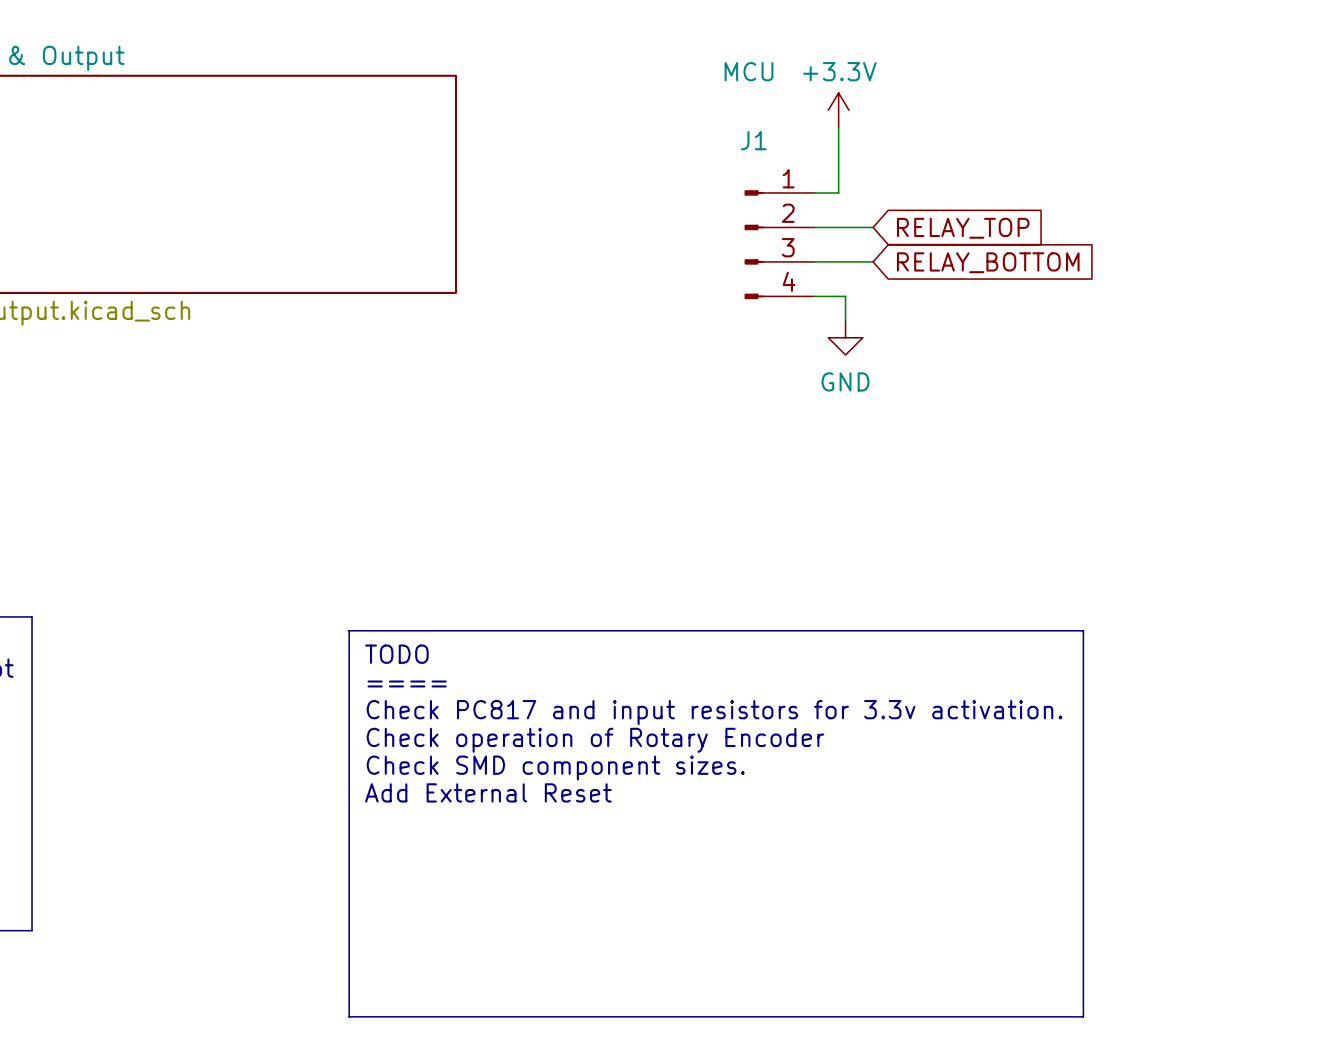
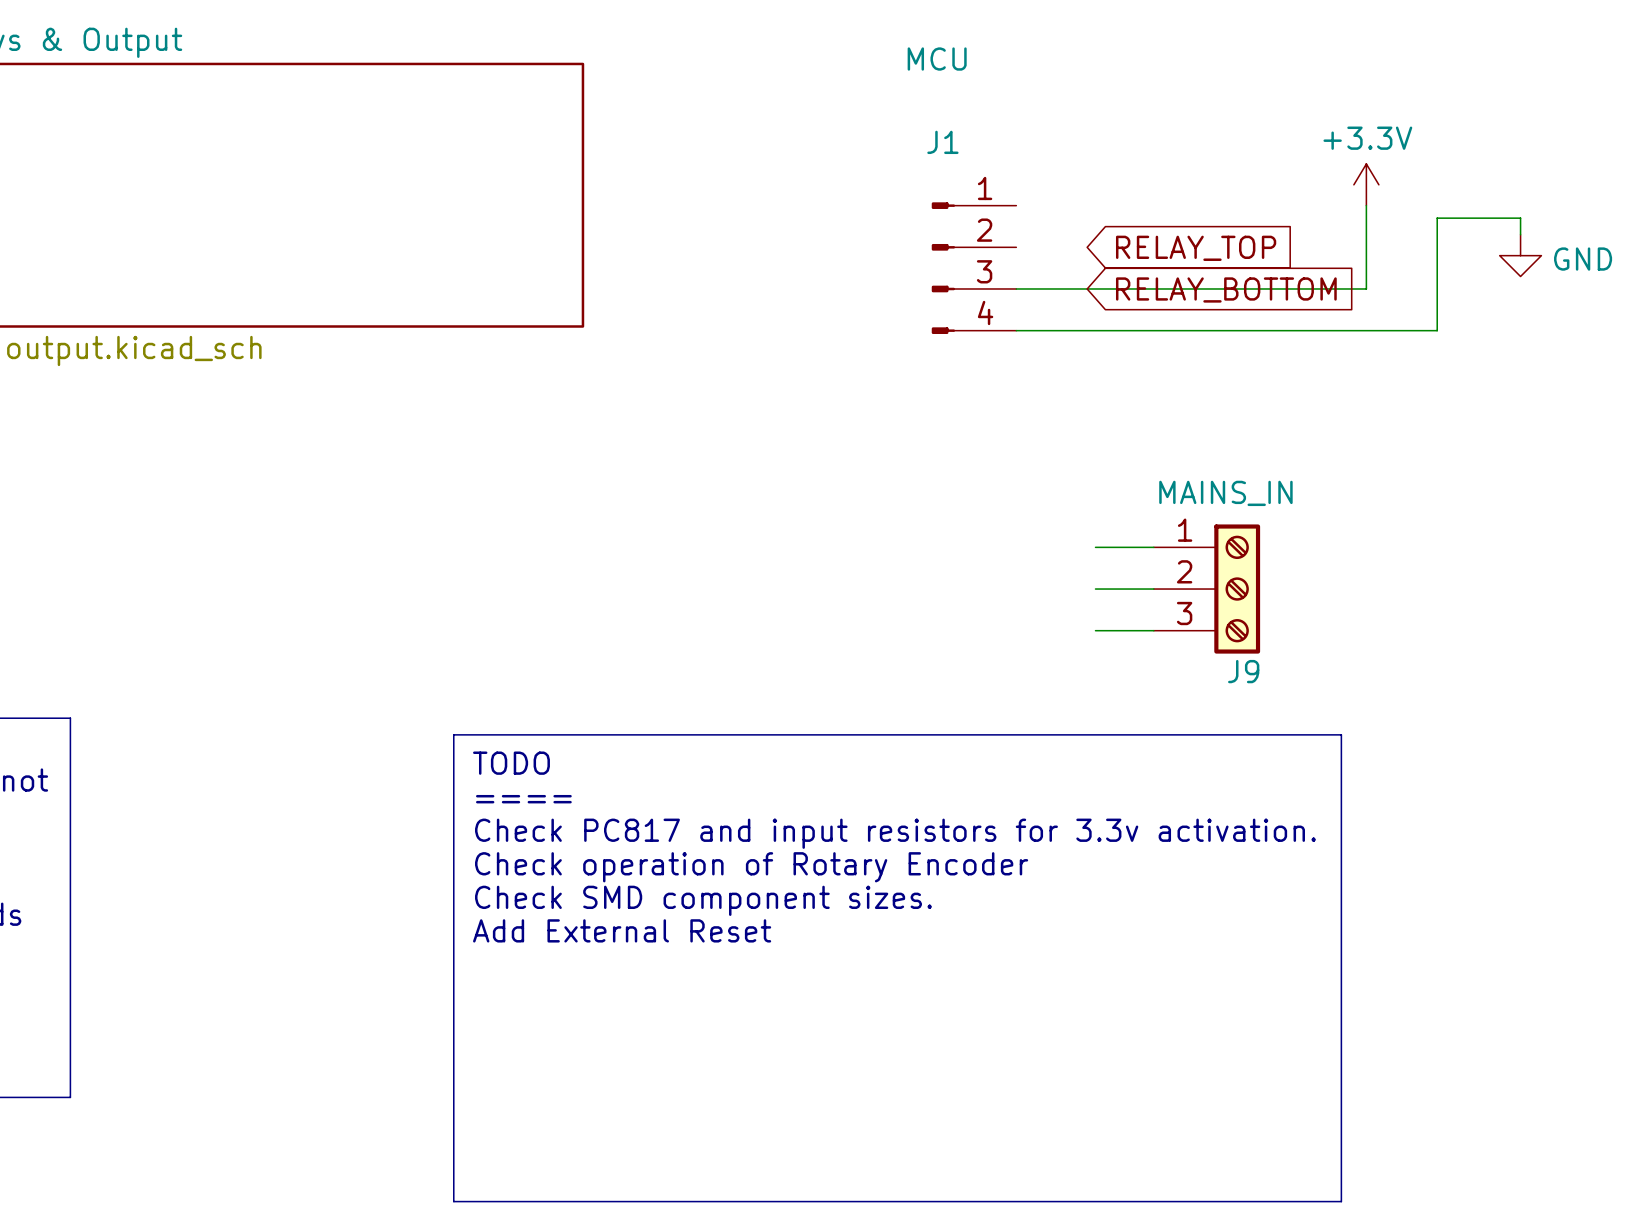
power symbol position: +3.3V (838, 110) -> +3.3V (1366, 184)
wire: (838, 127) (838, 192) (814, 192) -> none
wire: none -> (1366, 205) (1366, 288) (1087, 288)
wire: (814, 227) (873, 227) -> none
power symbol: none -> GND (1520, 255)
wire: (845, 296) (845, 320) -> (1053, 330) (1437, 330) (1437, 218) (1520, 218) (1520, 234)
power symbol: GND (845, 337) -> none
wire: none -> (1095, 547) (1153, 547)
wire: none -> (1095, 589) (1153, 589)
J9: none -> MAINS_IN (1206, 589)
wire: none -> (1095, 630) (1153, 630)

